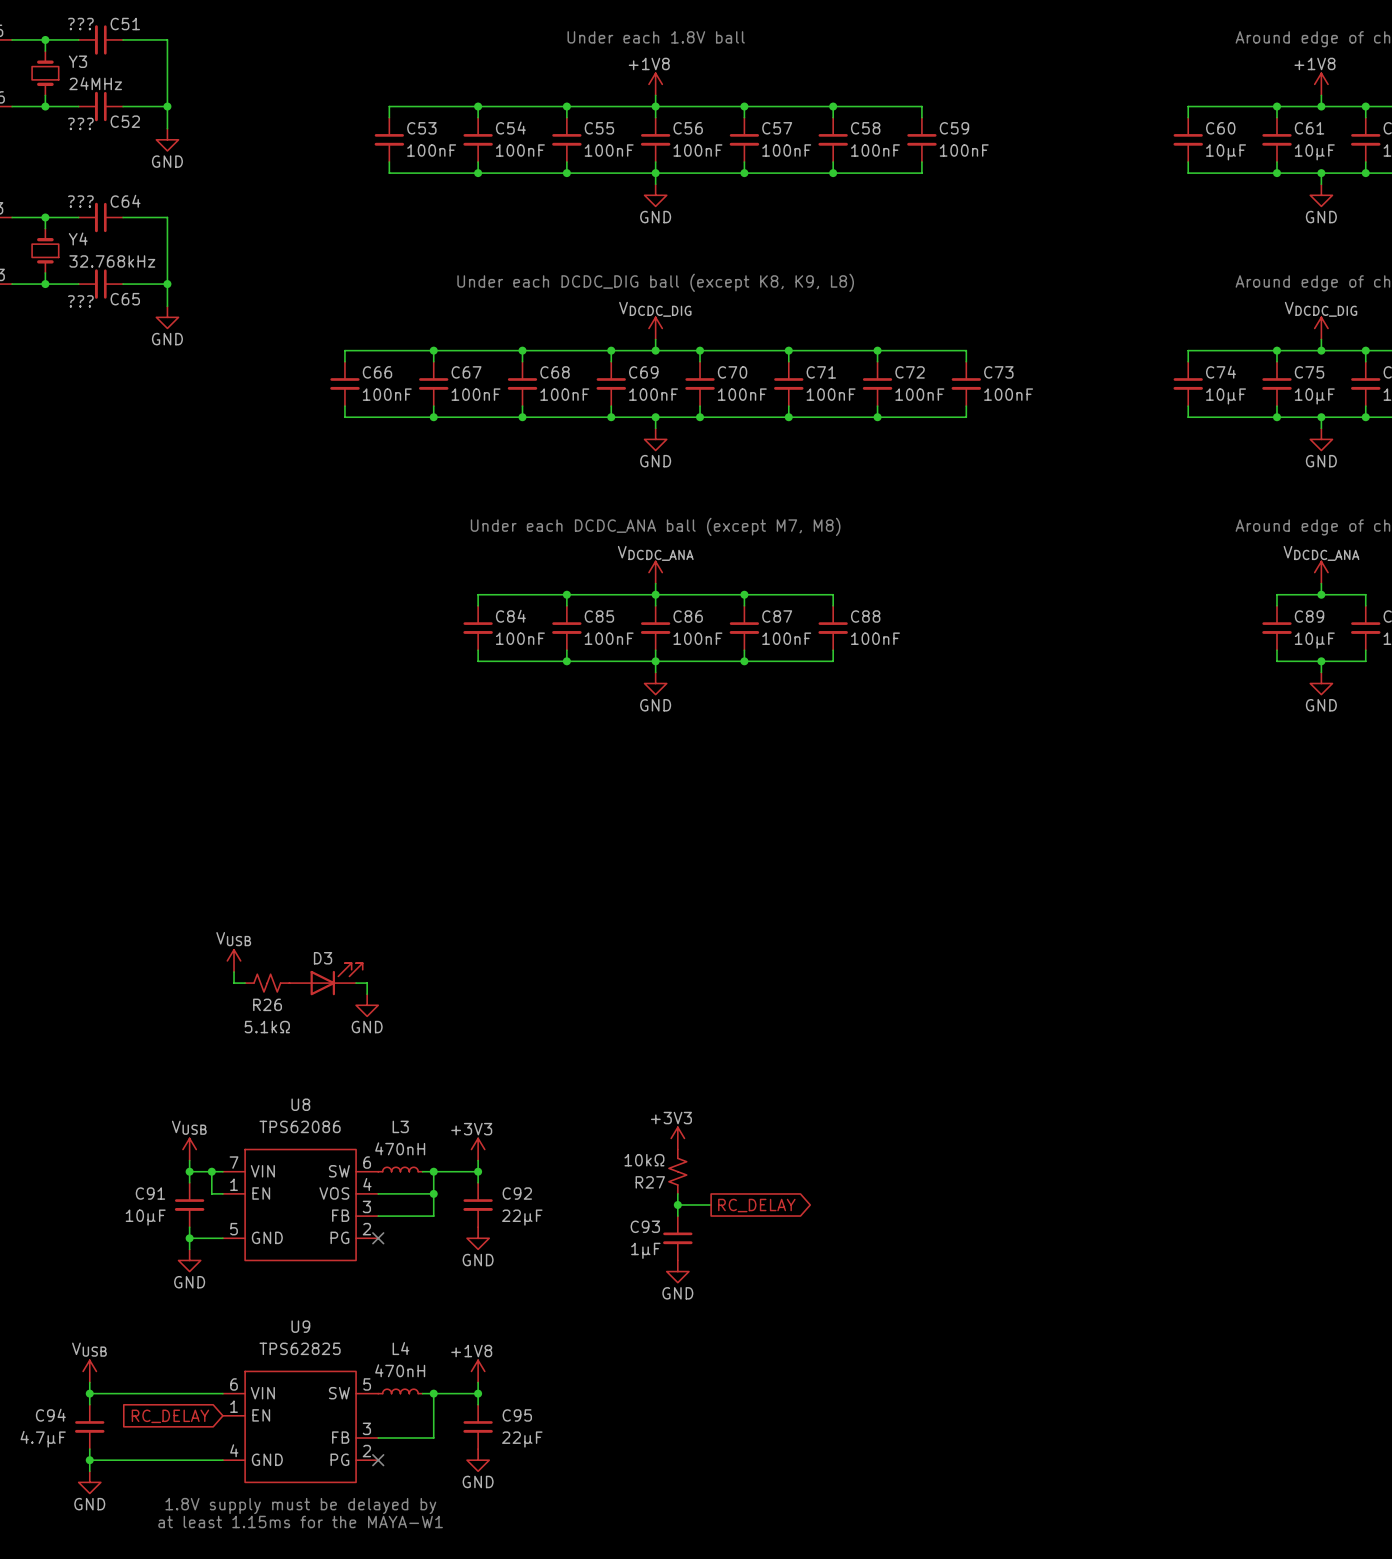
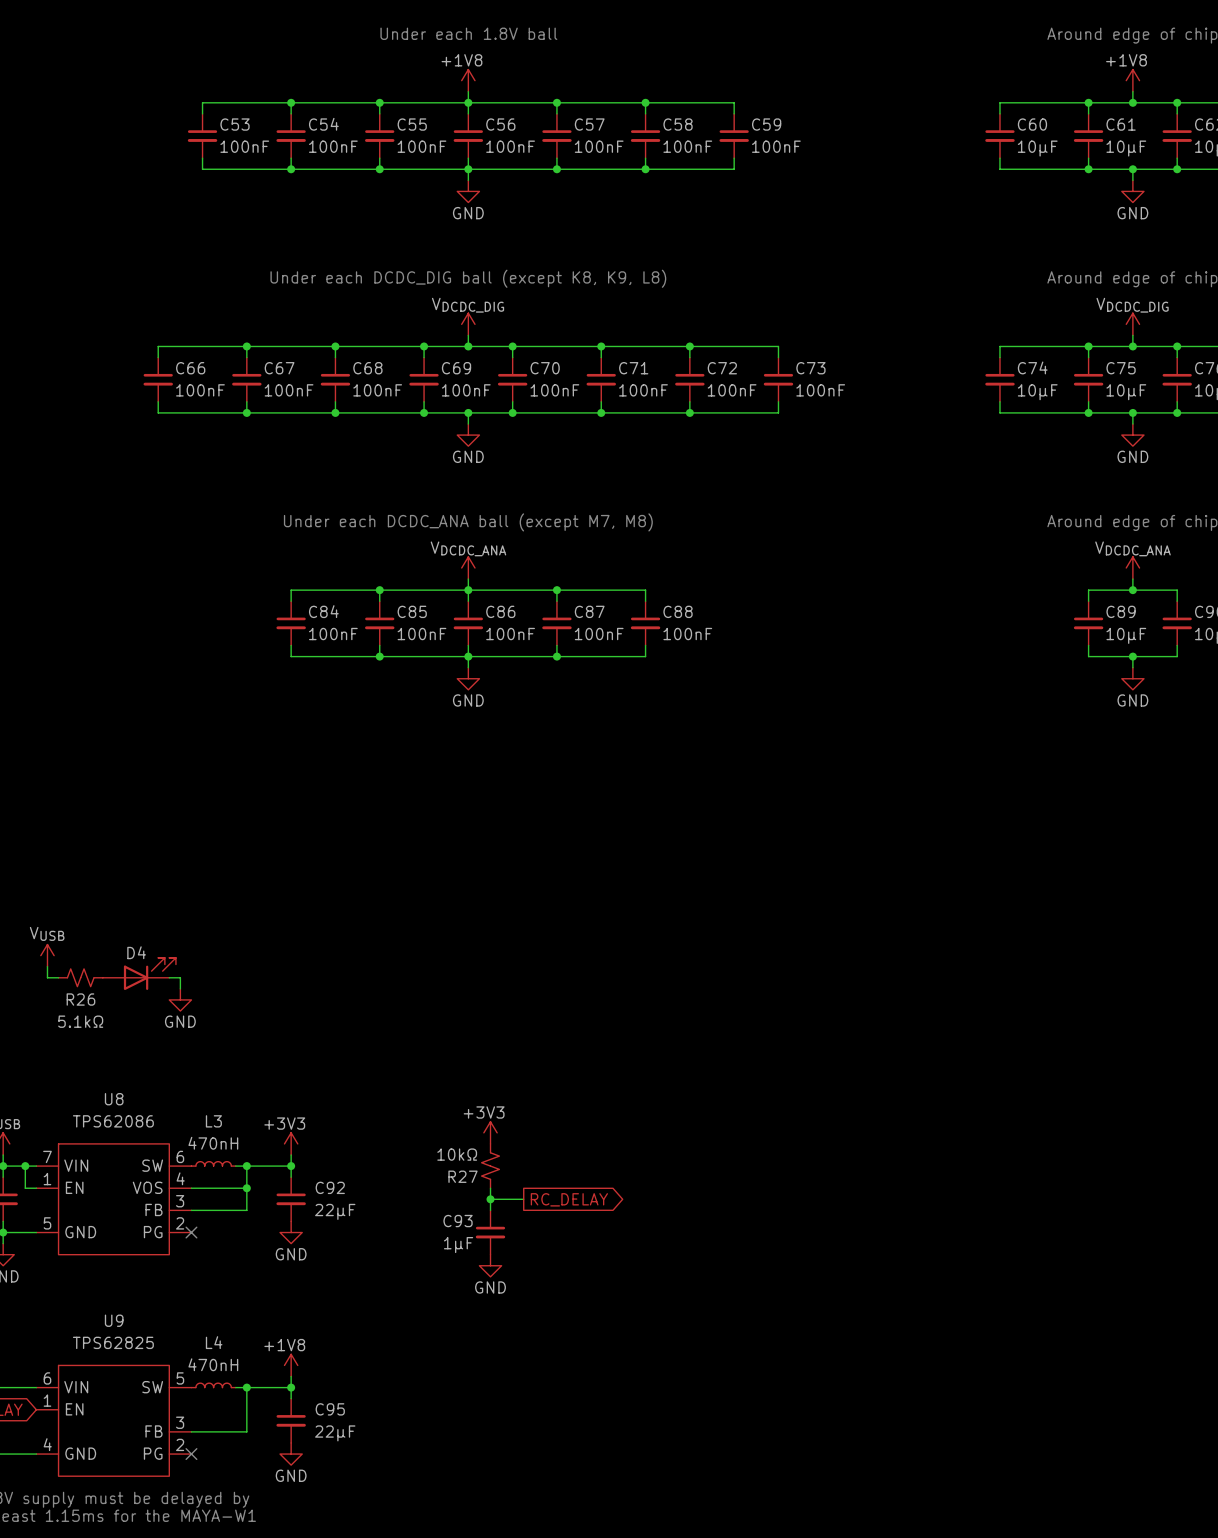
D3 name: D3 (323, 958) -> D4 (136, 952)

